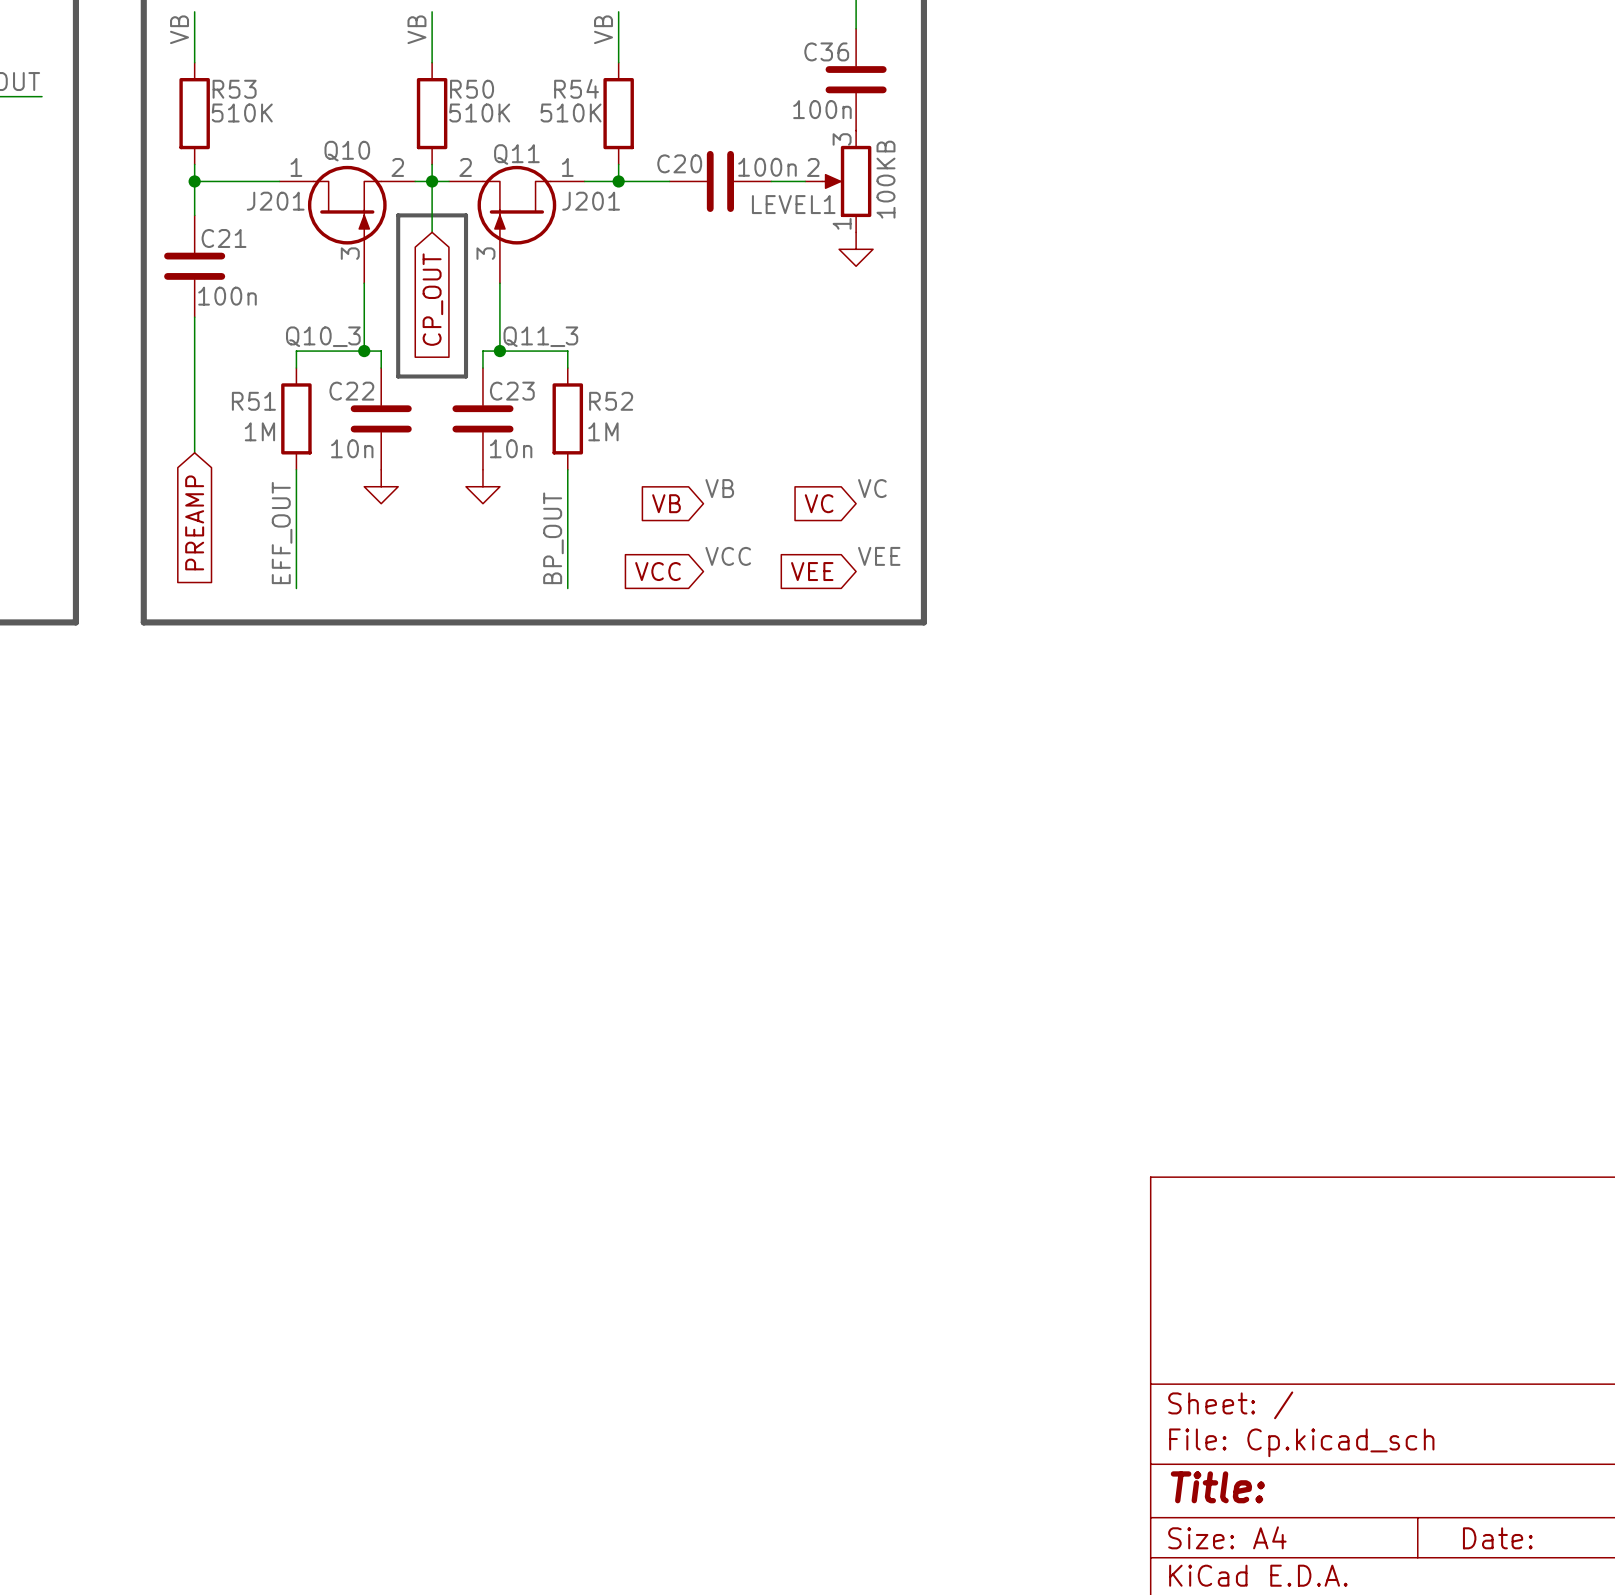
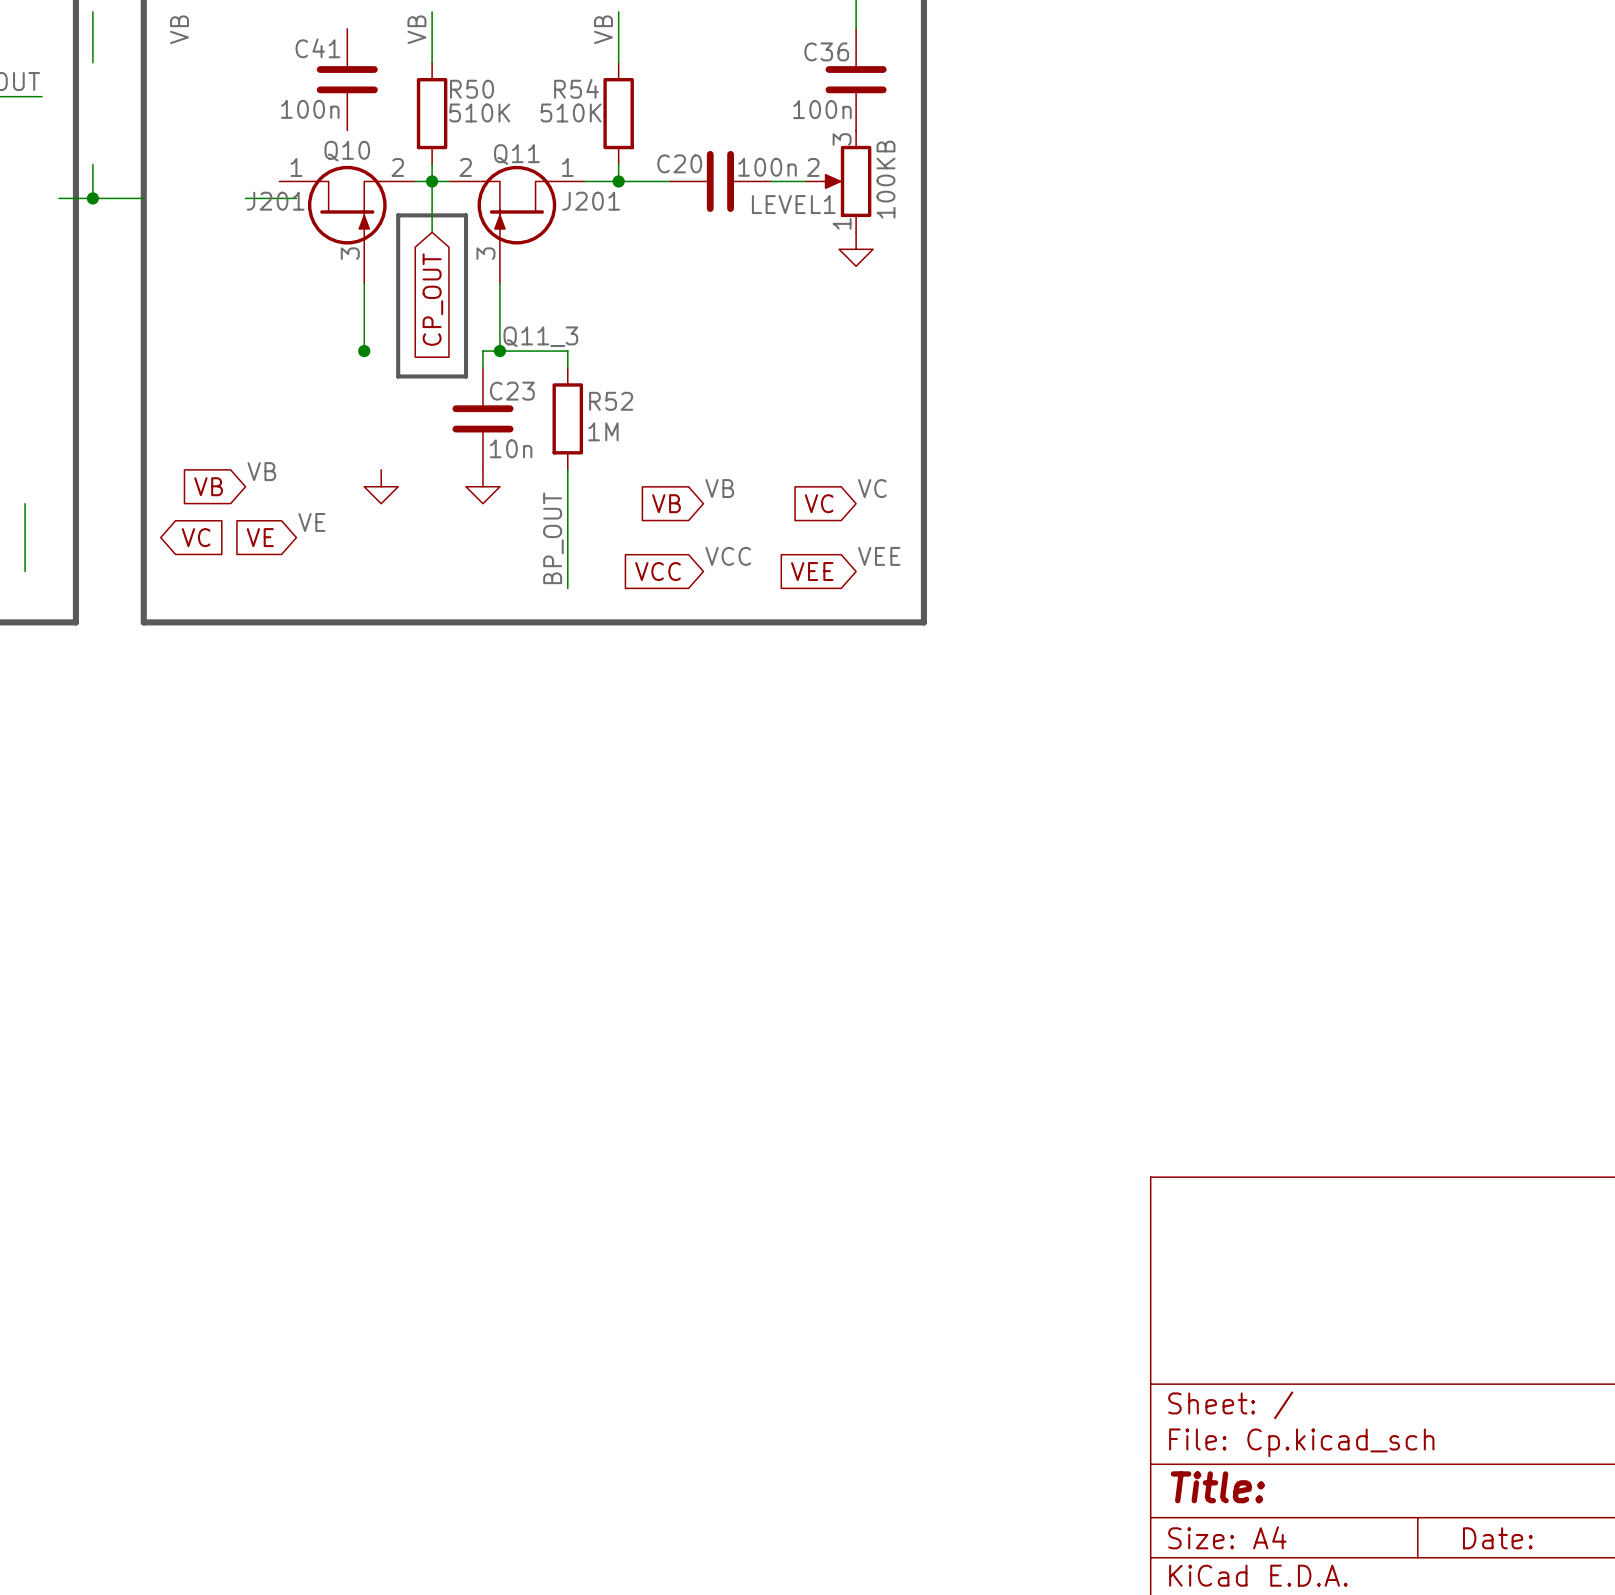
wire: (194, 11) (194, 62) -> (92, 11) (92, 62)
C41: none -> 100n (347, 79)
R53: 510K (194, 113) -> none
wire: none -> (92, 164) (92, 198)
wire: (194, 164) (194, 215) -> none
wire: (194, 181) (279, 181) -> (58, 198) (143, 198)
junction: (194, 181) -> none
junction: none -> (92, 198)
wire: none -> (245, 198) (296, 198)
C21: 100n (194, 266) -> none
wire: (194, 317) (194, 452) -> none
label: Q10_3 (323, 336) -> none
wire: (296, 368) (296, 351) (381, 351) (381, 368) -> none
R51: 1M (296, 418) -> none
C22: 10n (381, 418) -> none
wire: (296, 469) (296, 588) -> none
label: none -> VB (261, 471)
global label: none -> VB (208, 486)
wire: none -> (25, 503) (25, 571)
global label: PREAMP (194, 522) -> none
label: none -> VE (311, 522)
label: EFF_OUT (282, 533) -> none
global label: none -> VC (196, 537)
global label: none -> VE (260, 537)

